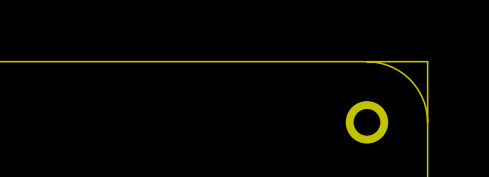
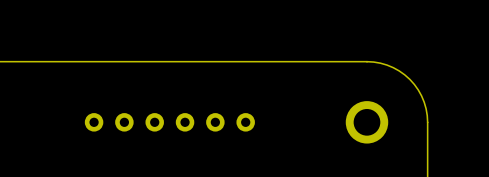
board edge: (366, 61) (427, 61) (427, 122) -> none
part: none -> (169, 122)

